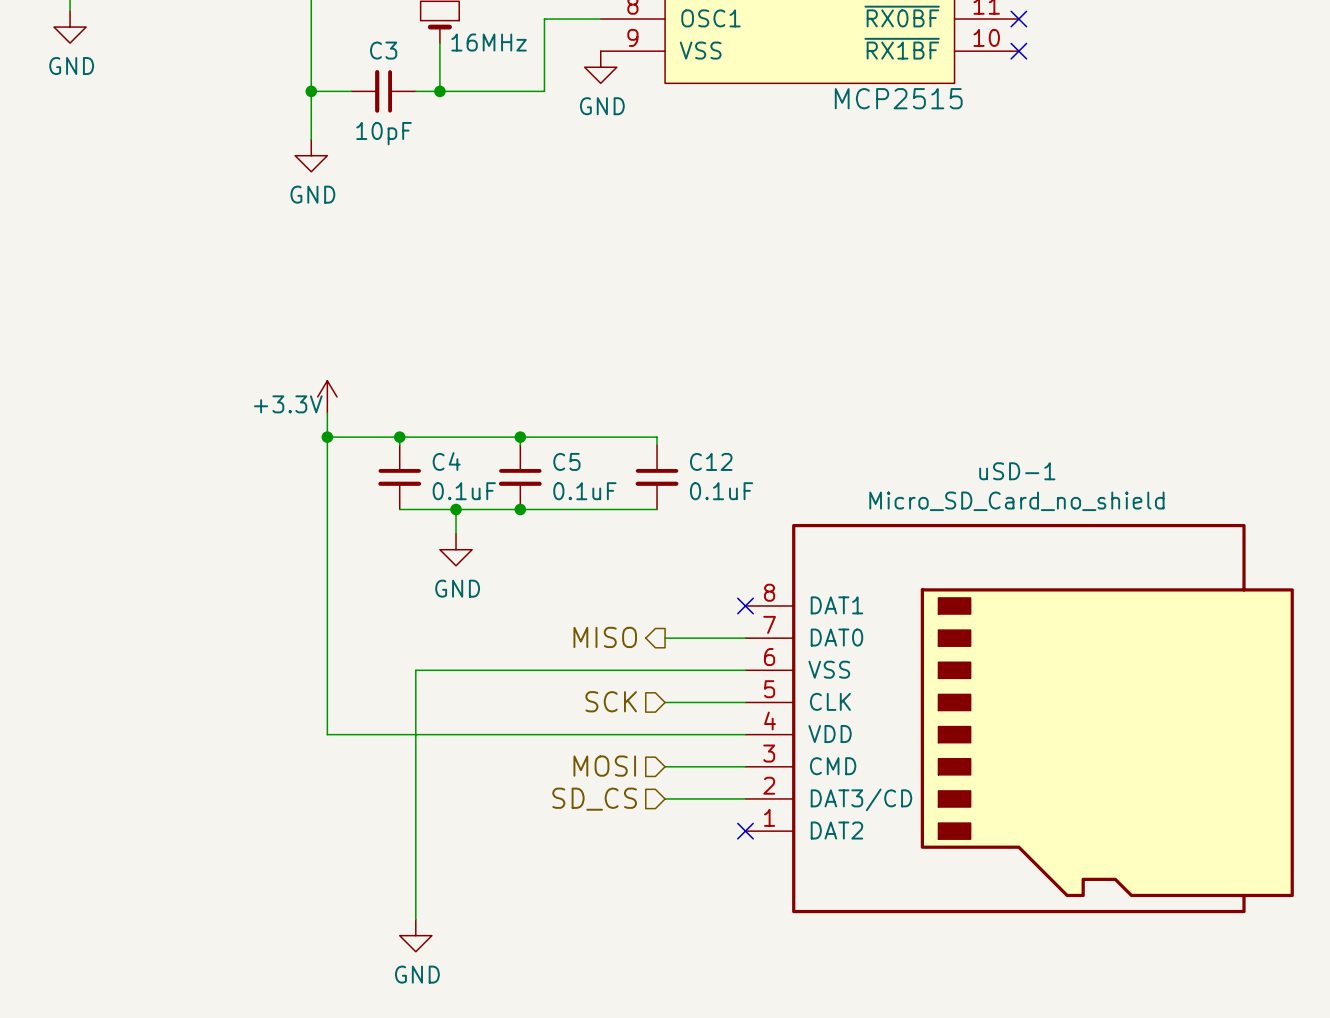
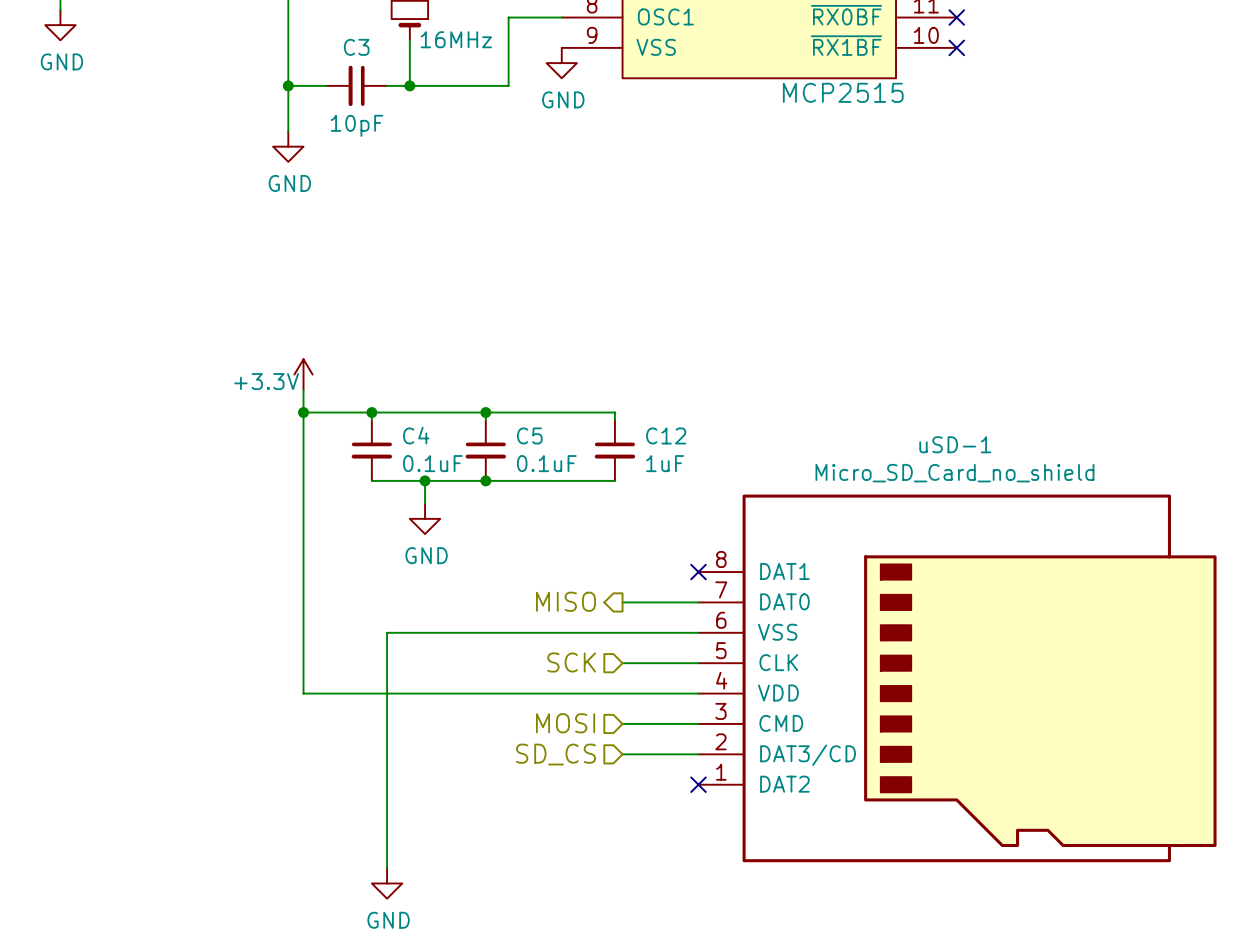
C12 value: 0.1uF (721, 491) -> 1uF (665, 463)

